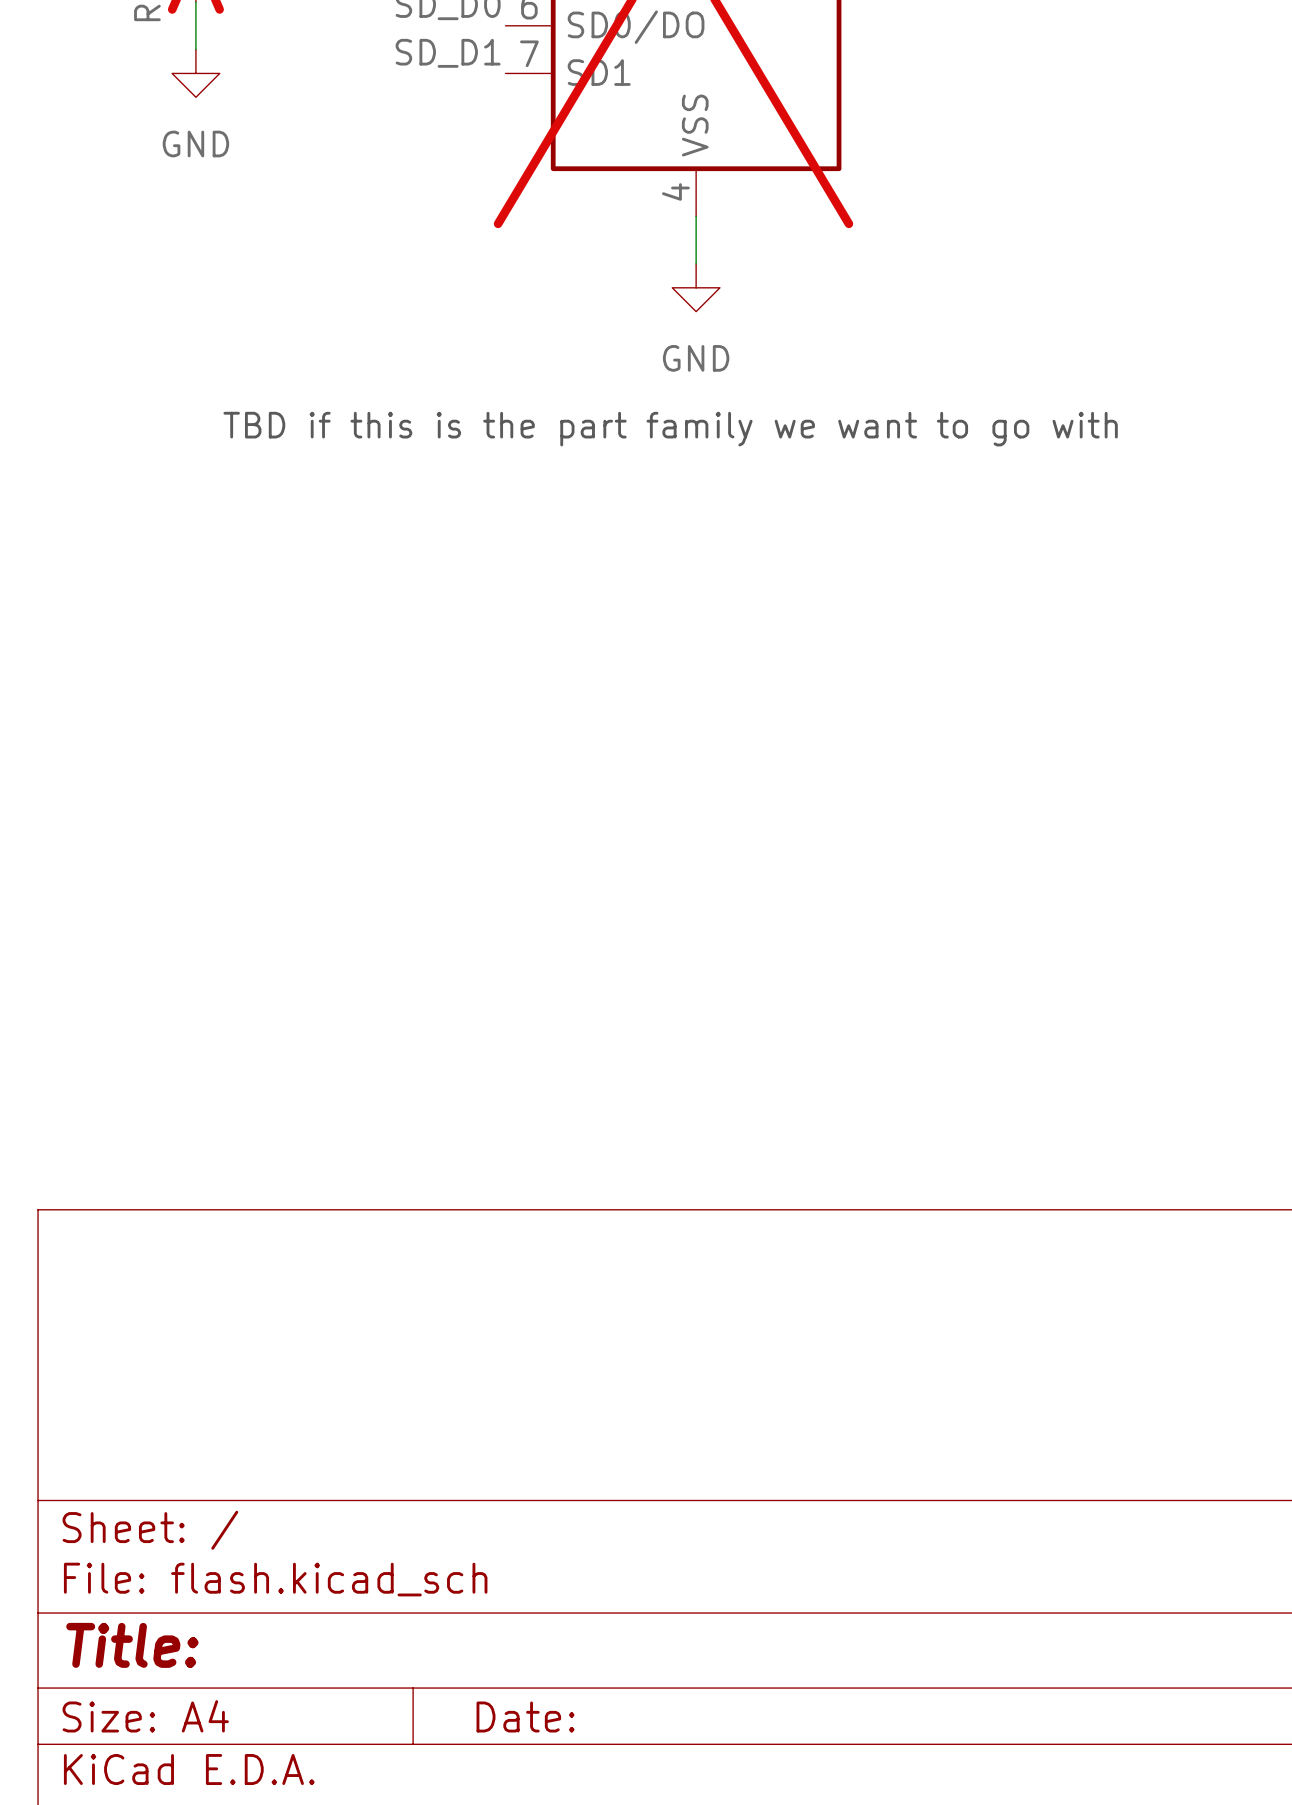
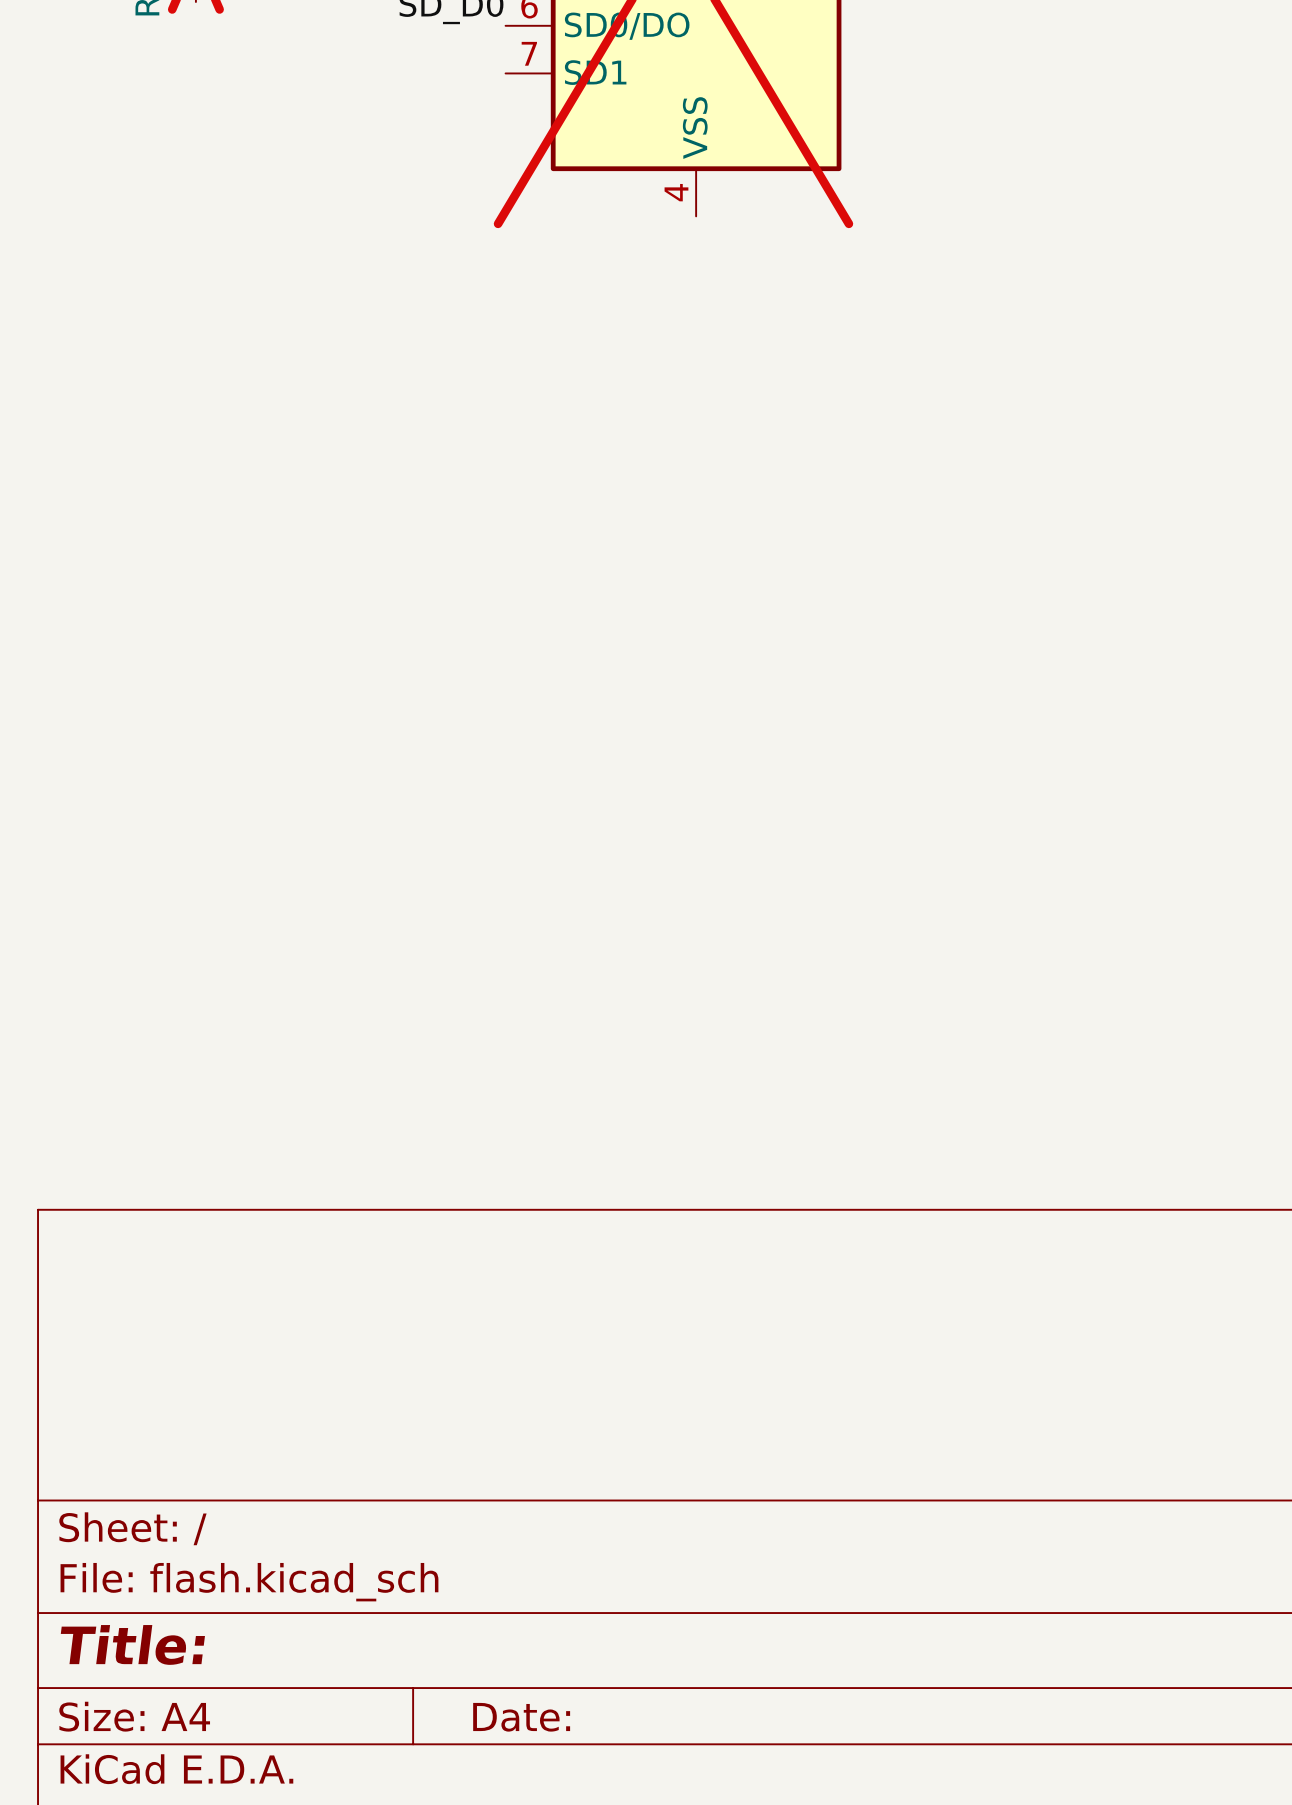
wire: (195, 1) (195, 49) -> none
label: SD_D1 (448, 53) -> none
power symbol: GND (195, 73) -> none
wire: (696, 216) (696, 263) -> none
power symbol: GND (696, 287) -> none
text: TBD if this is the part family we want to go with (670, 429) -> none

